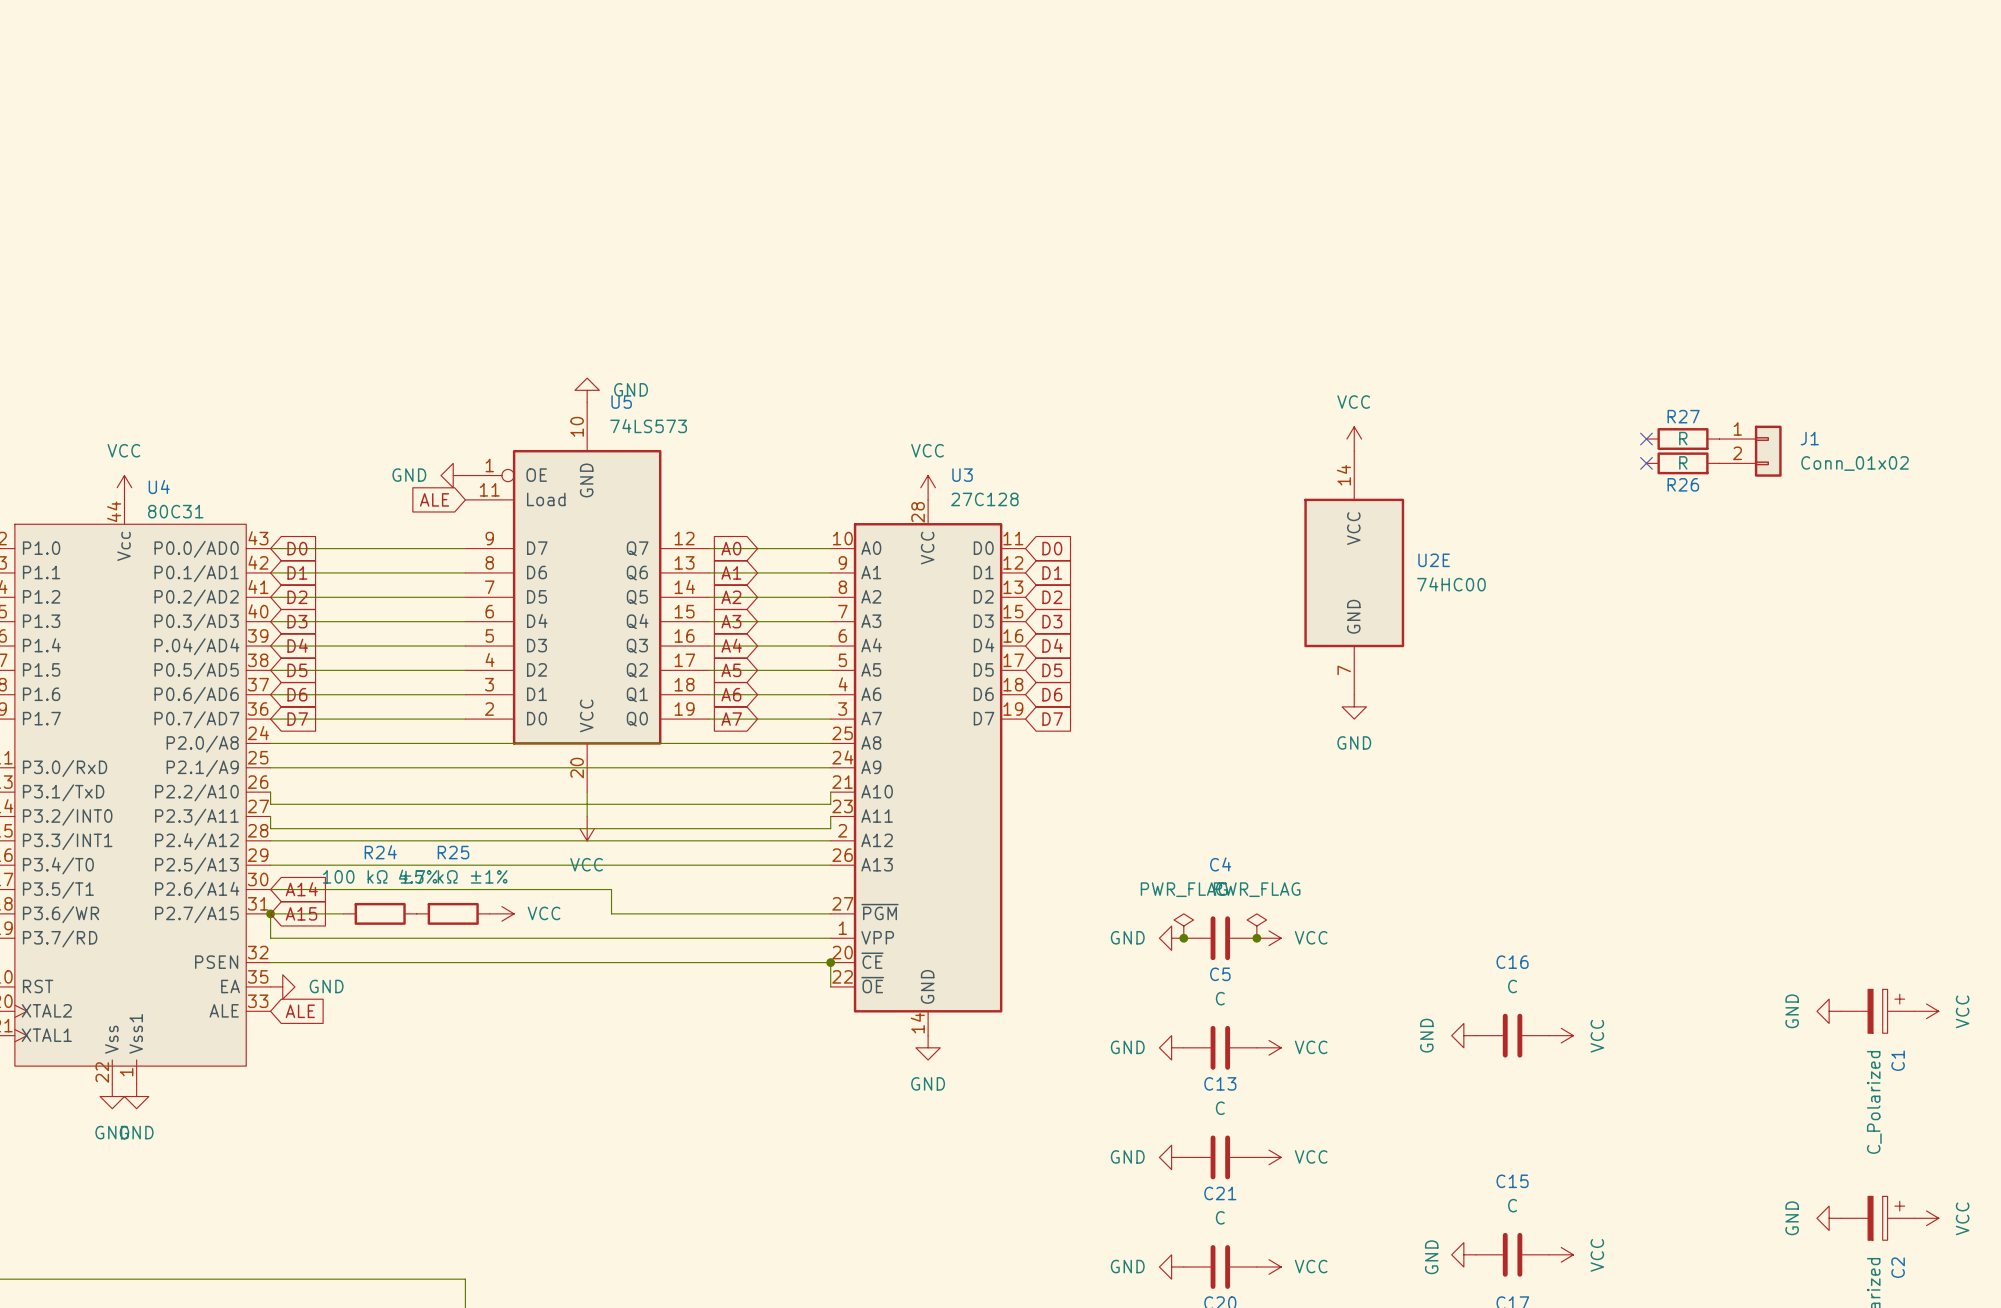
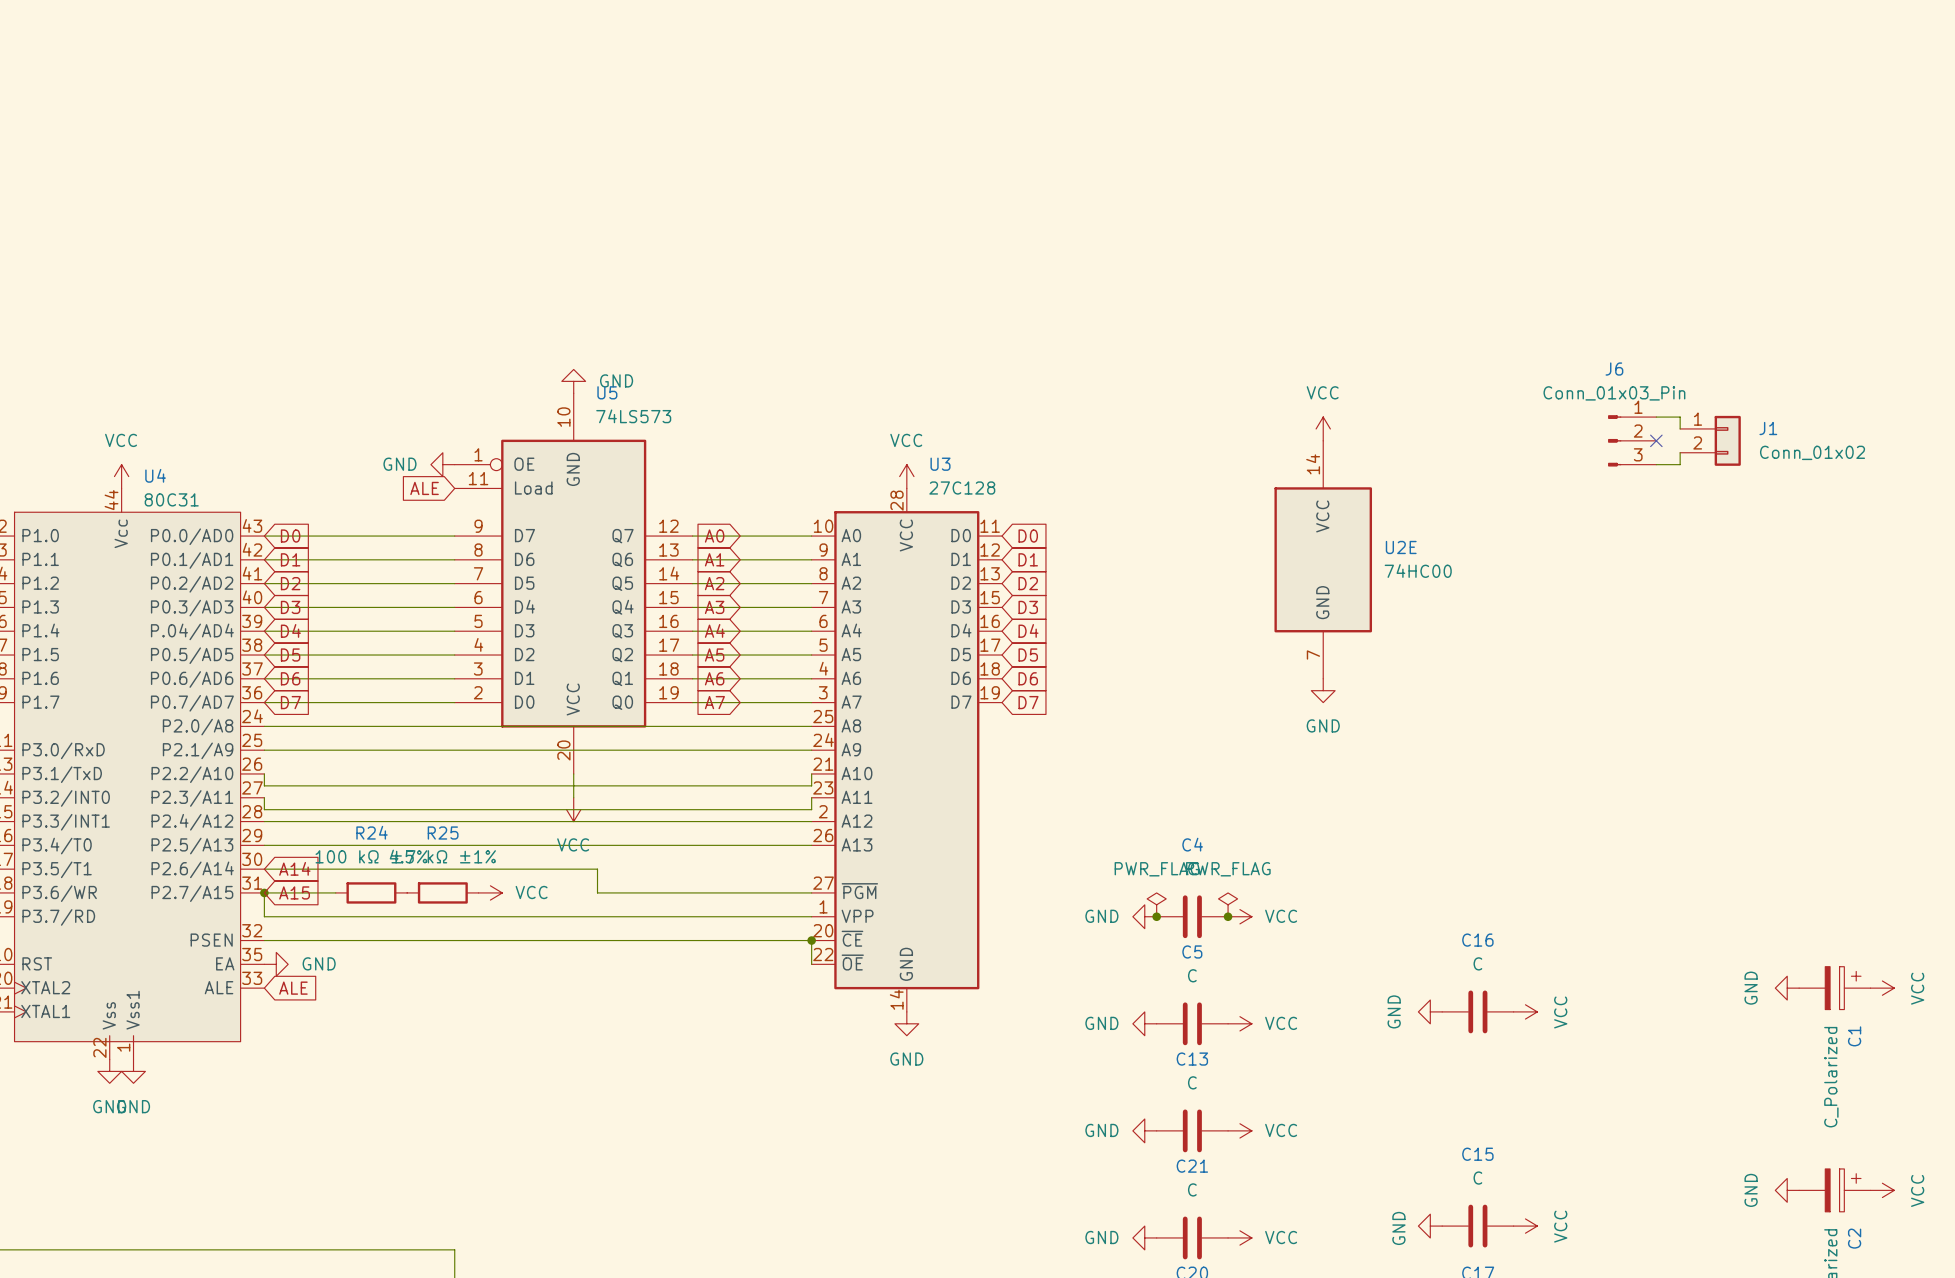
wire: none -> (1656, 417) (1680, 417) (1680, 428)
no-connect mark: (1646, 439) -> none
R27: R (1683, 439) -> none
J6: none -> Conn_01x03_Pin (1632, 440)
no-connect mark: none -> (1656, 440)
no-connect mark: (1646, 463) -> none
R26: R (1683, 463) -> none
wire: none -> (1680, 452) (1680, 464) (1656, 464)

